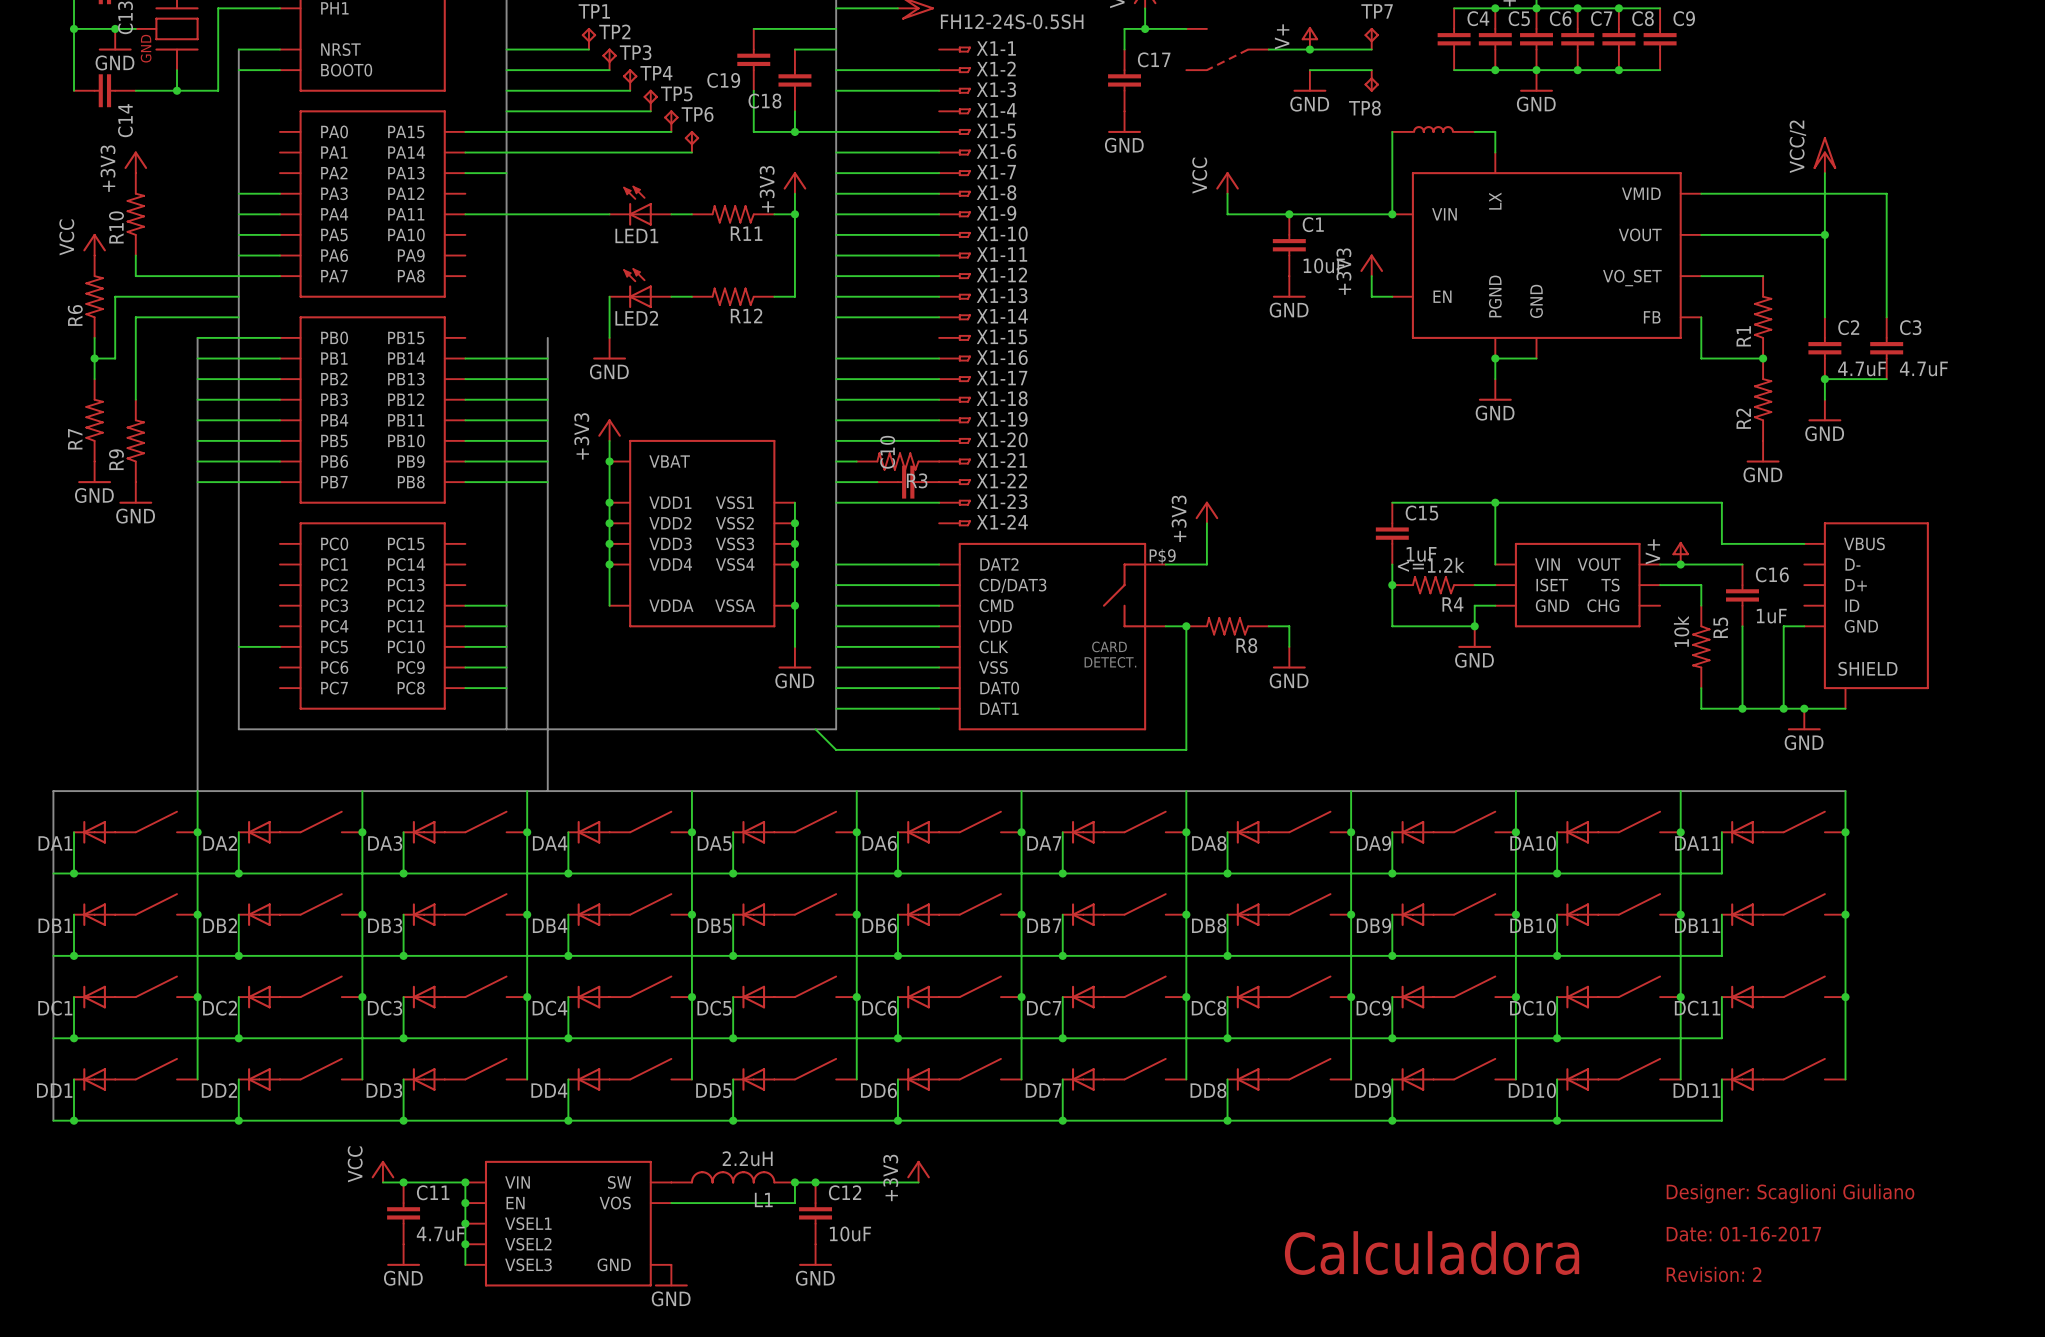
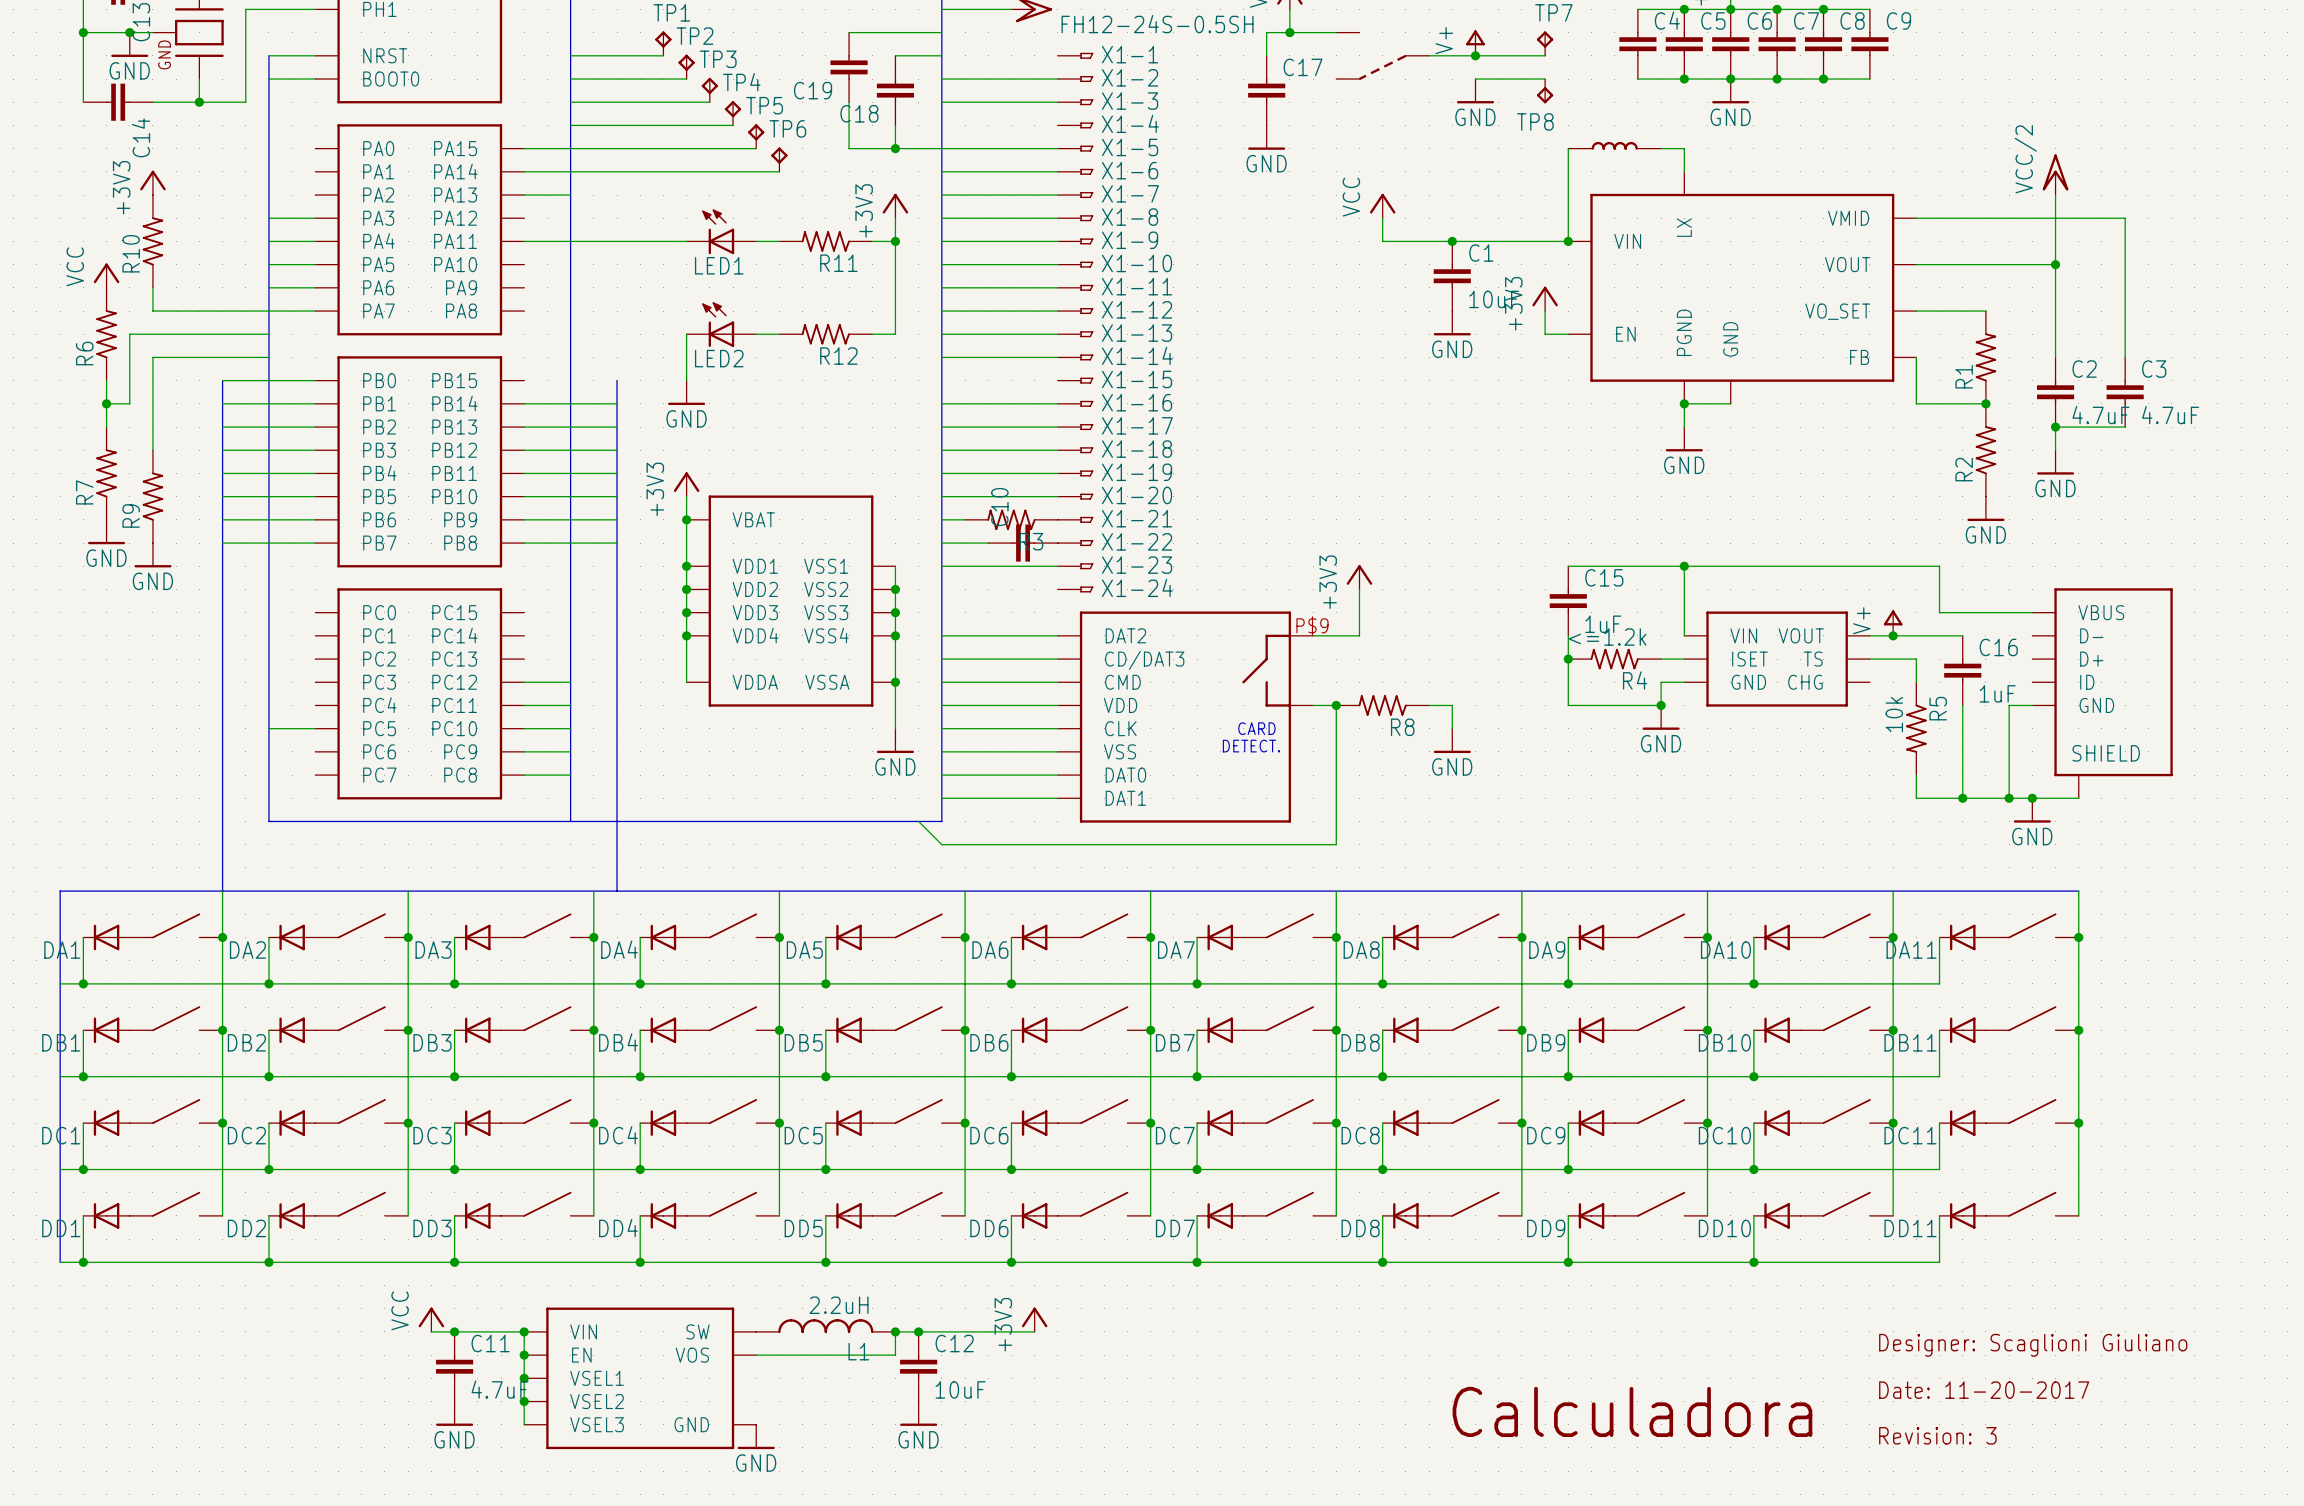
text: Date: 01-16-2017 (1743, 1234) -> Date: 11-20-2017 (1984, 1390)
text: Revision: 2 (1714, 1274) -> Revision: 3 (1937, 1435)

